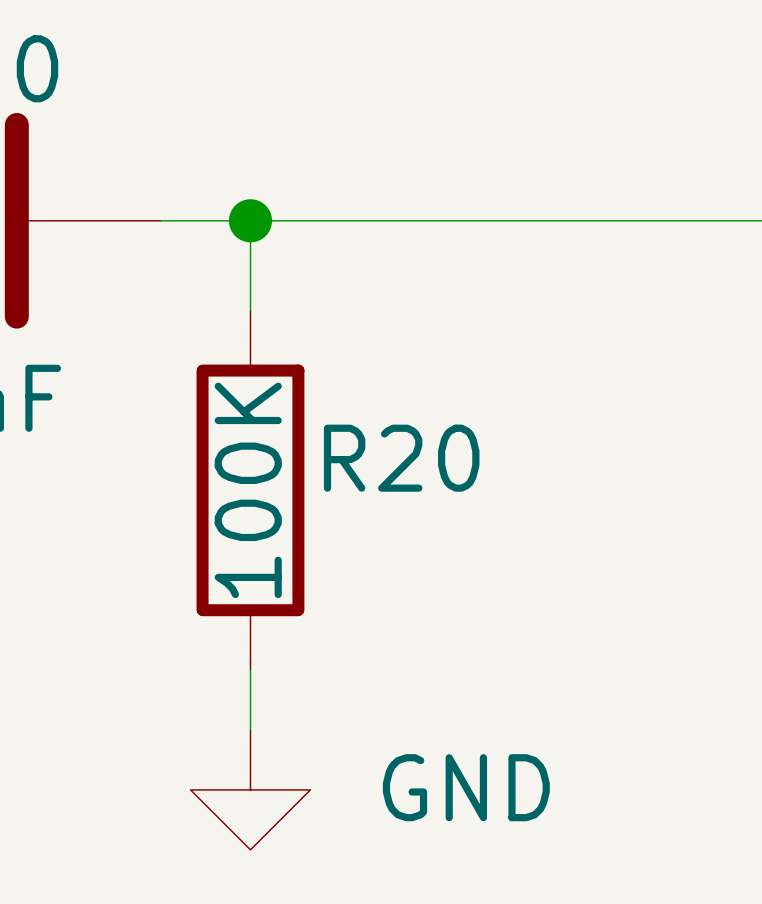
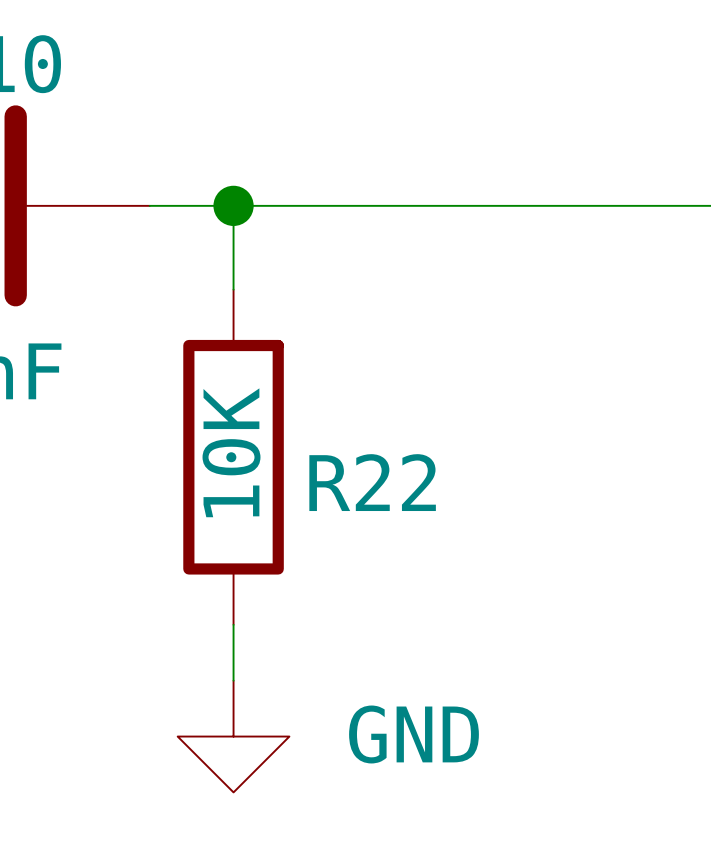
R20 name: R20 (401, 458) -> R22 (372, 482)
R20 value: 100K (248, 490) -> 10K (231, 452)

